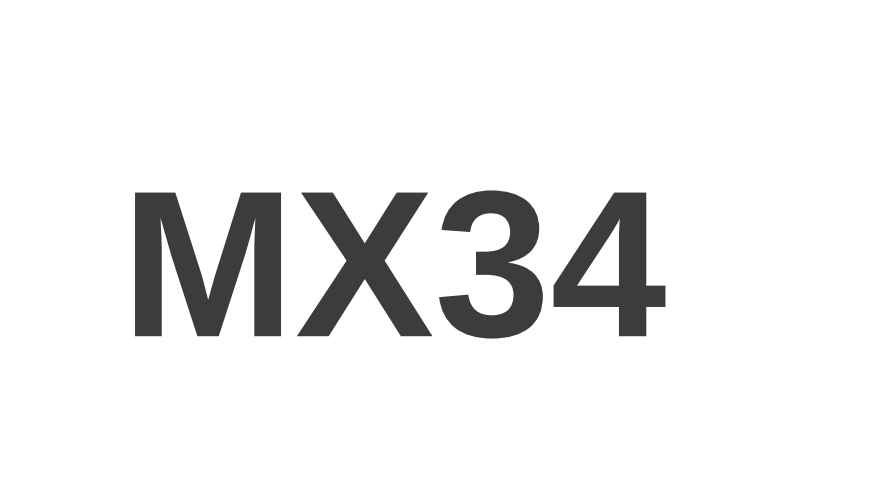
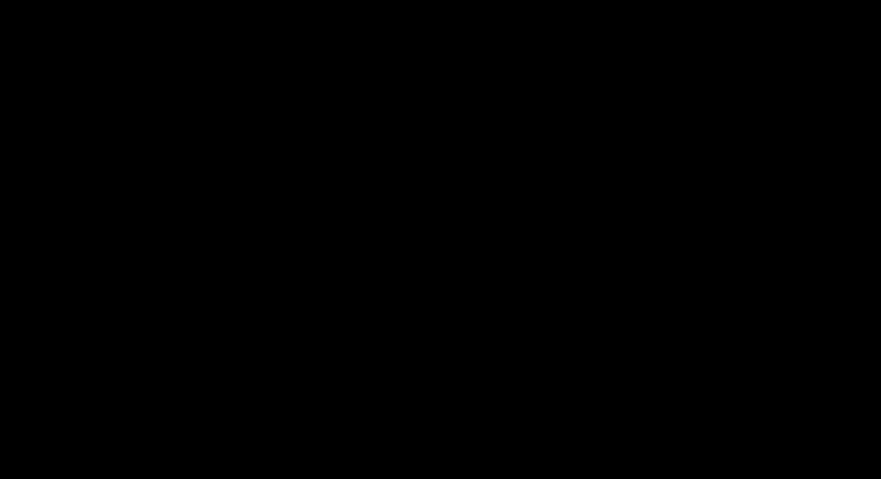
text: MX34 (400, 264) -> none

